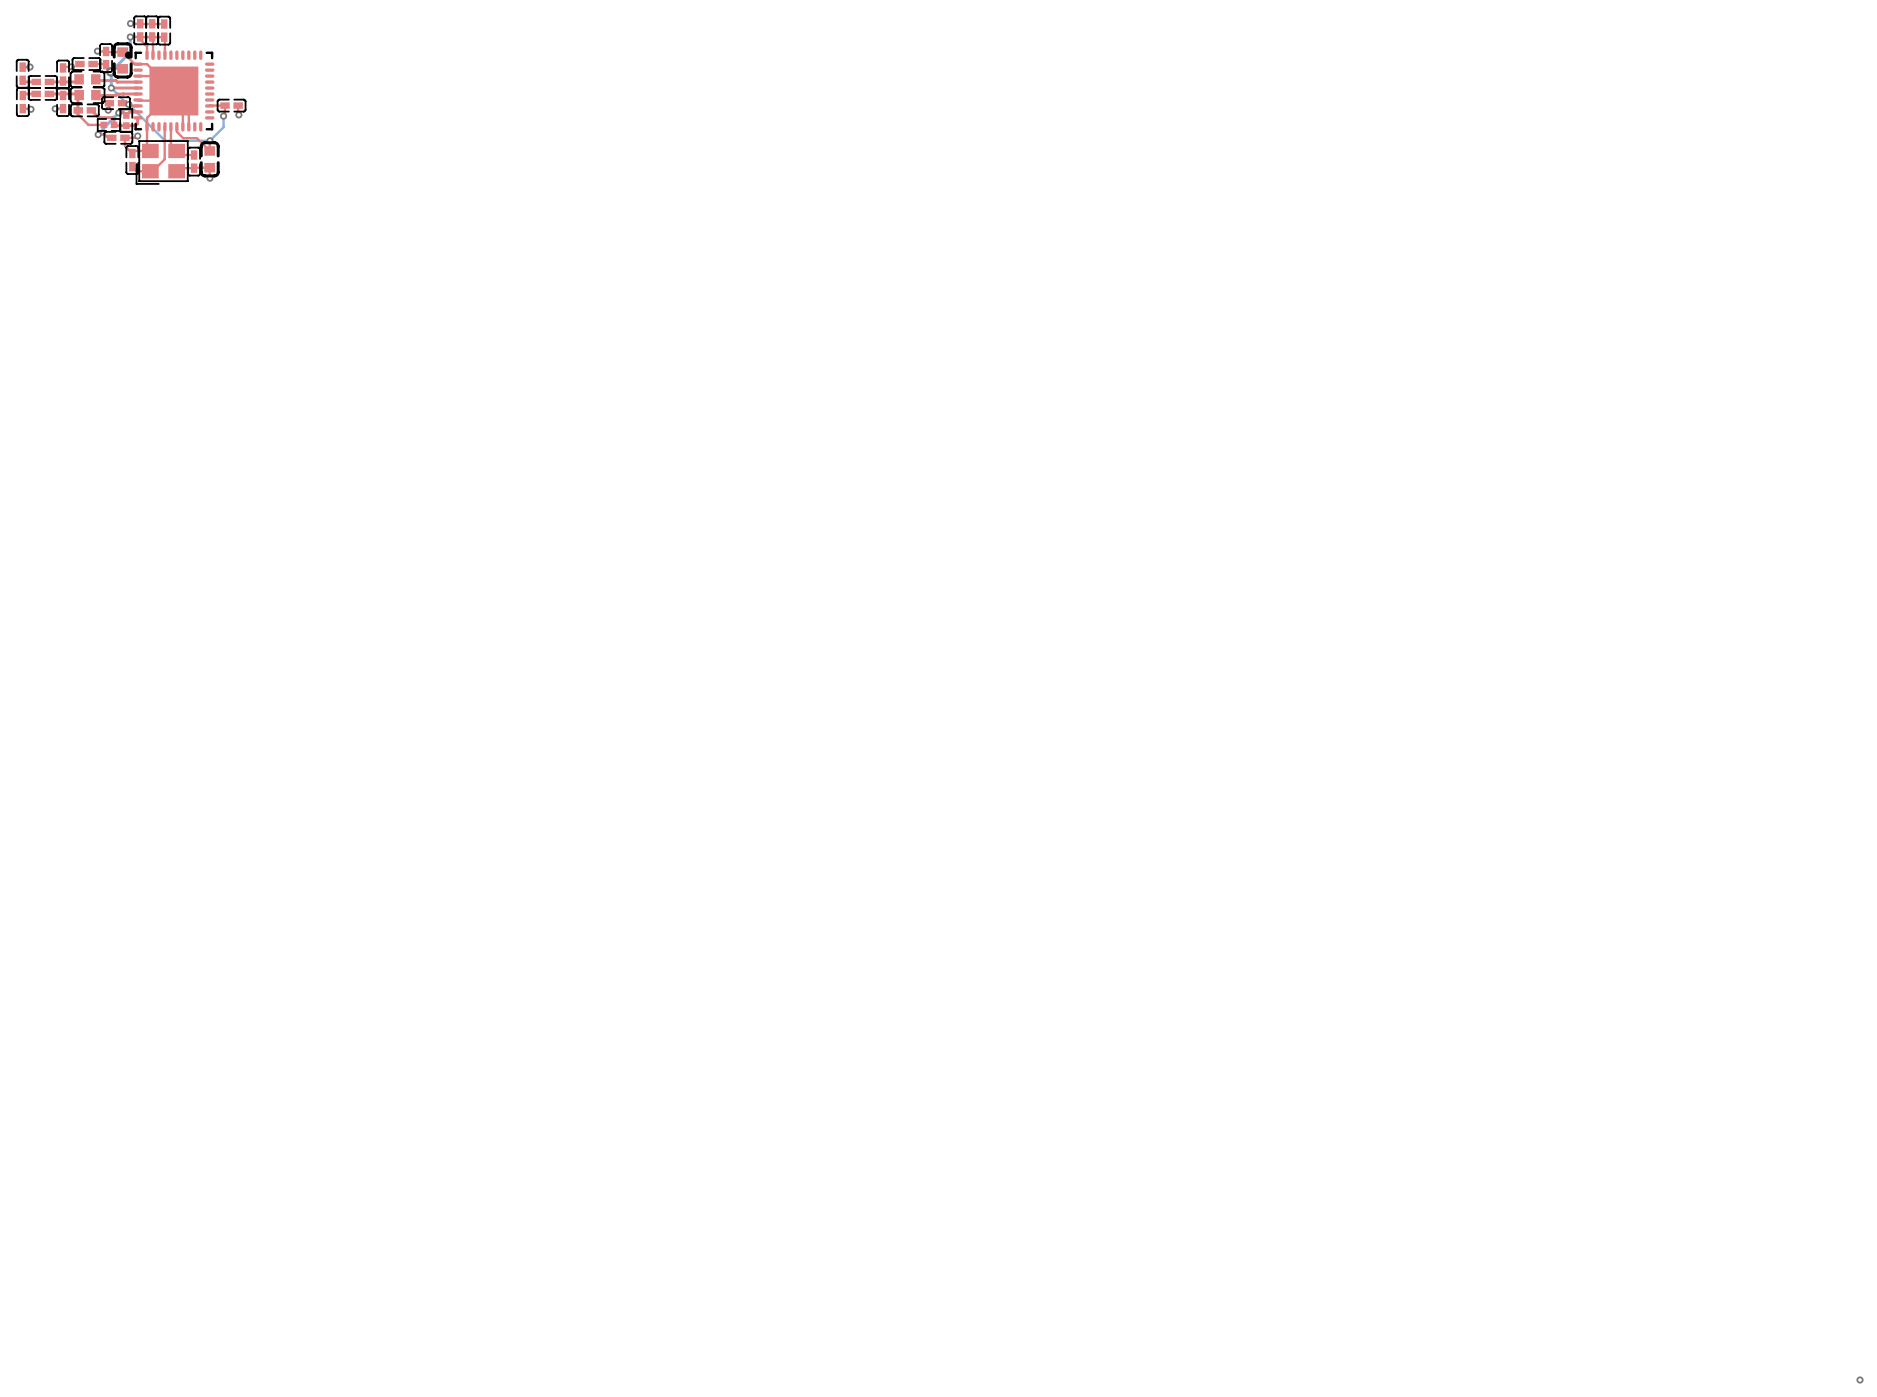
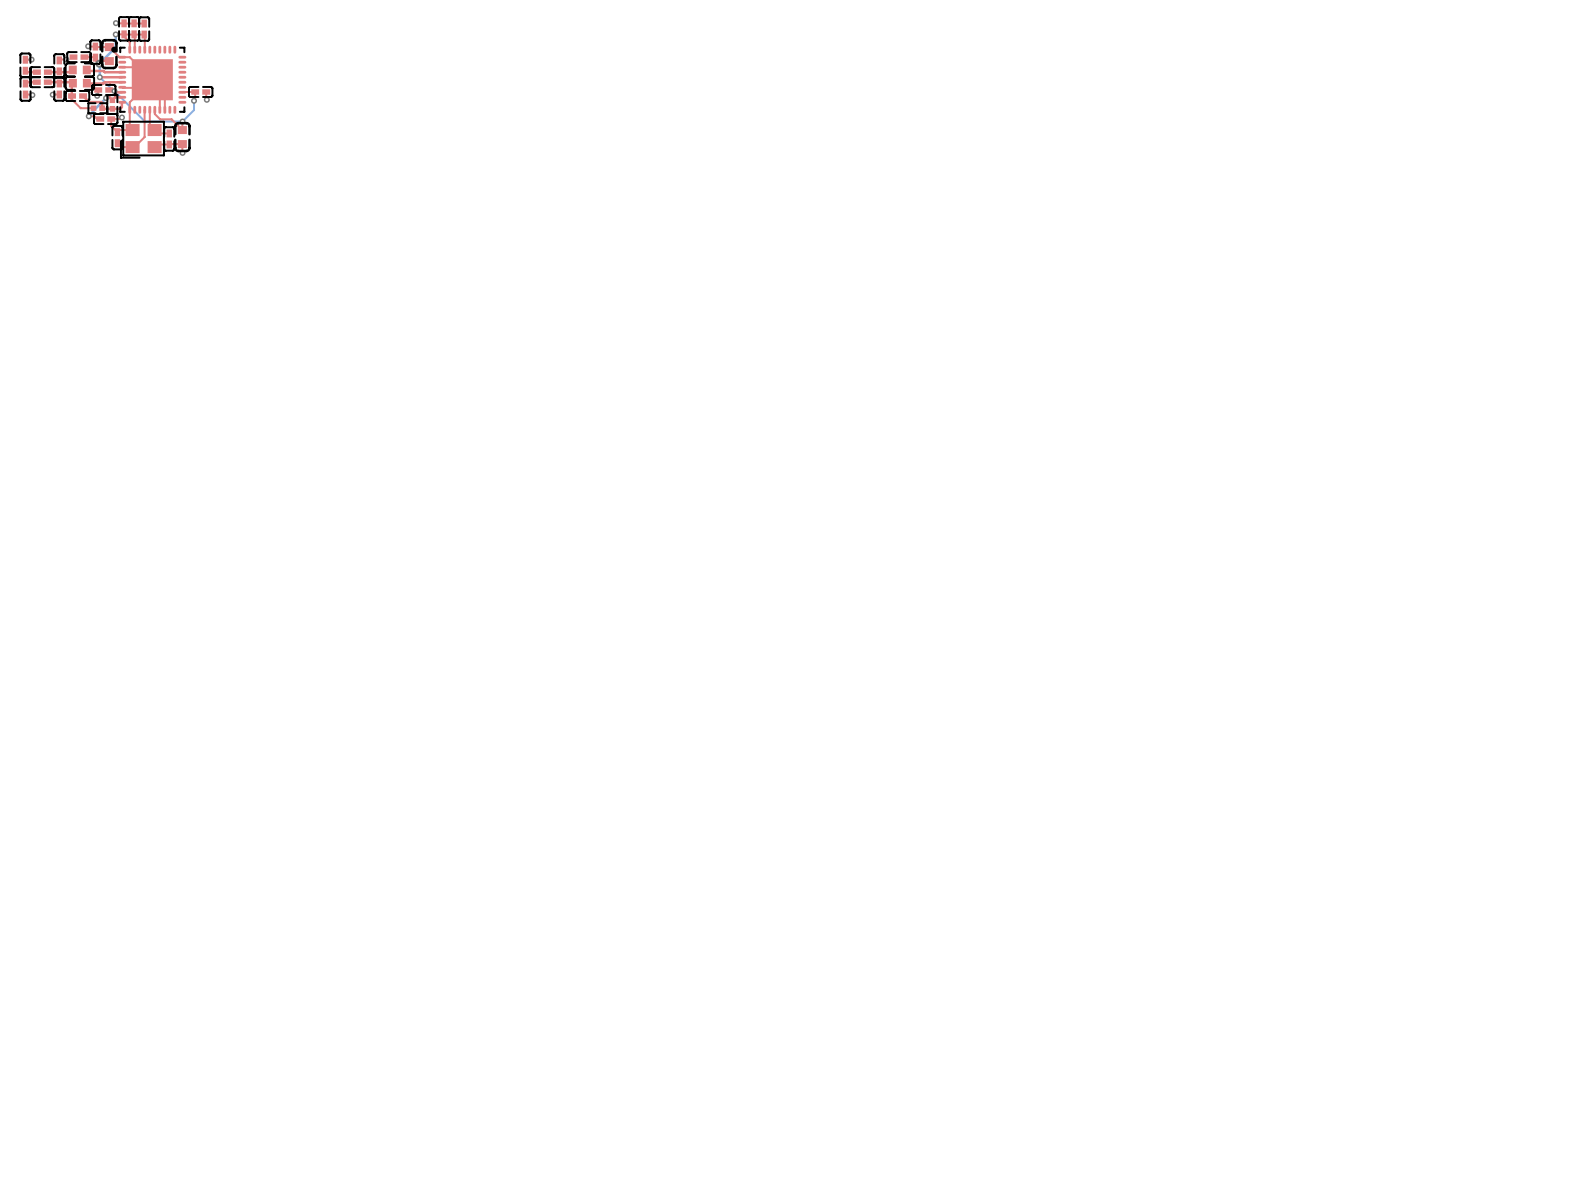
via: (1860, 1379) -> none

